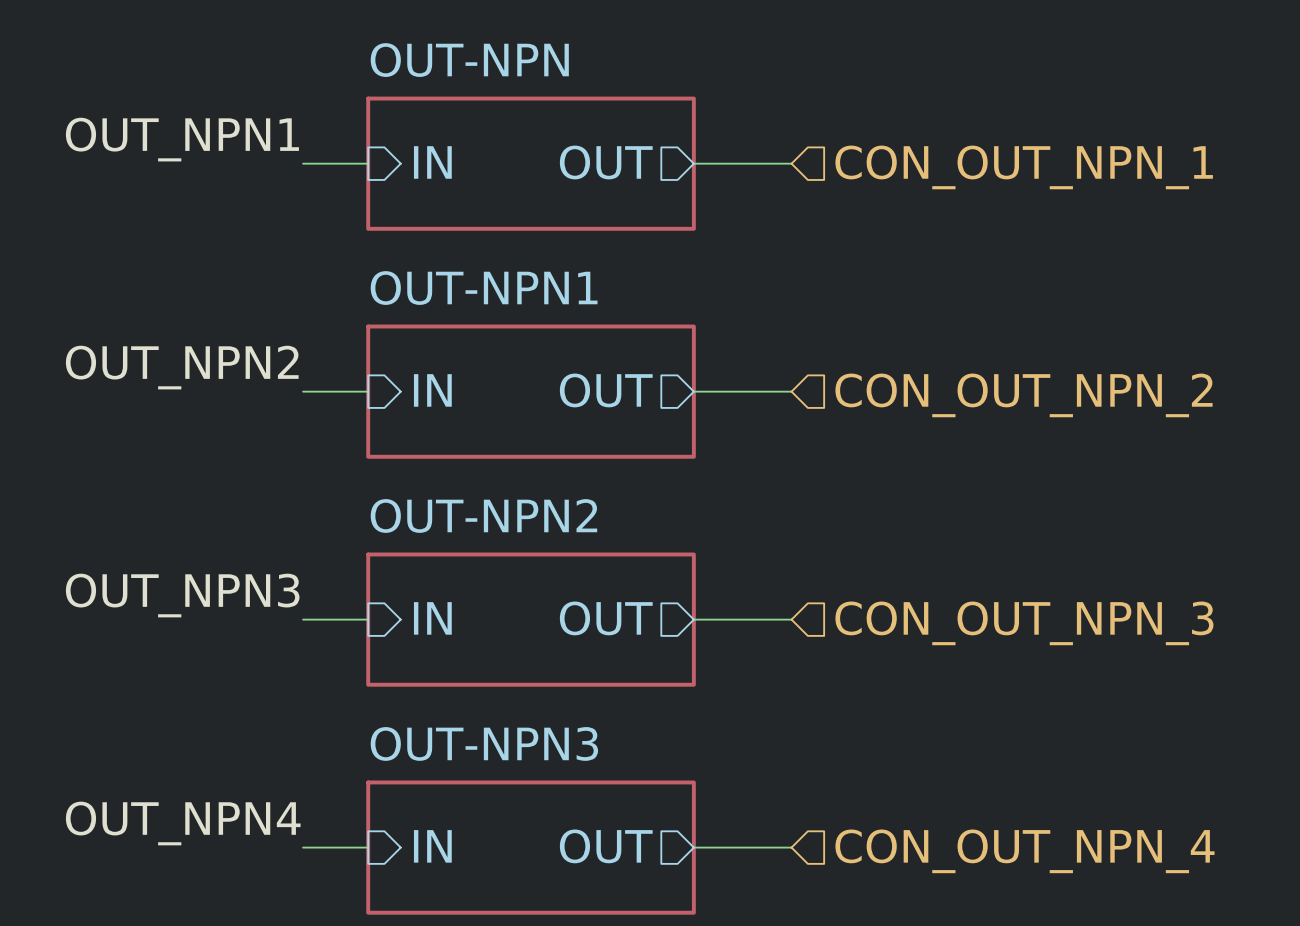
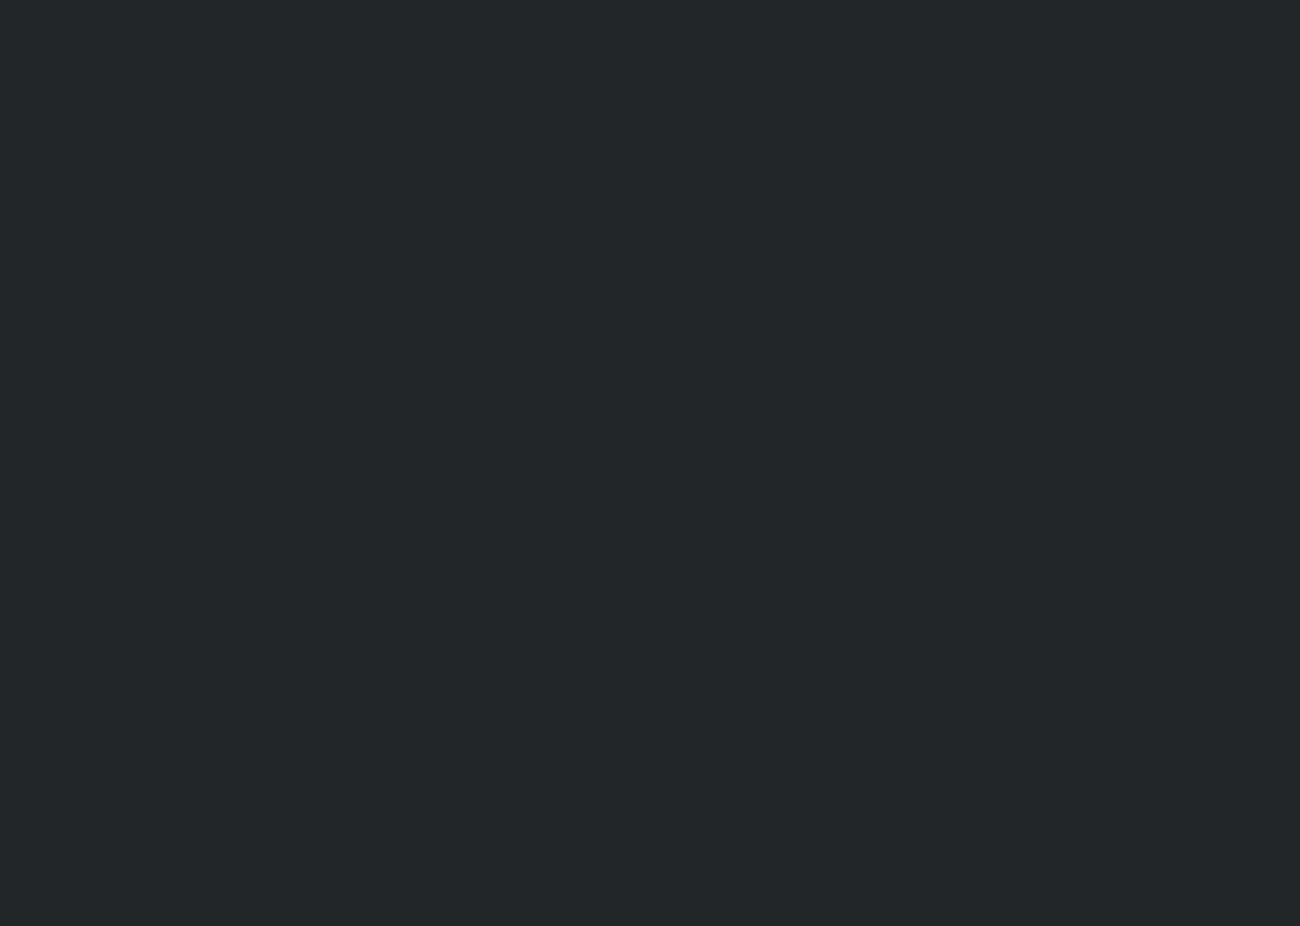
label: OUT_NPN1 (182, 139) -> none
sheet pin: IN (432, 162) -> none
sheet pin: OUT (606, 162) -> none
wire: (303, 163) (368, 163) -> none
sheet OUT-NPN: (531, 163) -> none
wire: (693, 163) (791, 163) -> none
hierarchical label: CON_OUT_NPN_1 (1024, 167) -> none
label: OUT_NPN2 (182, 367) -> none
sheet pin: IN (432, 390) -> none
sheet pin: OUT (606, 390) -> none
wire: (303, 391) (368, 391) -> none
sheet OUT-NPN1: (531, 391) -> none
wire: (693, 391) (791, 391) -> none
hierarchical label: CON_OUT_NPN_2 (1024, 395) -> none
label: OUT_NPN3 (182, 595) -> none
sheet pin: IN (432, 618) -> none
sheet pin: OUT (606, 618) -> none
wire: (303, 619) (368, 619) -> none
sheet OUT-NPN2: (531, 619) -> none
wire: (693, 619) (791, 619) -> none
hierarchical label: CON_OUT_NPN_3 (1024, 623) -> none
label: OUT_NPN4 (183, 823) -> none
sheet pin: IN (432, 846) -> none
sheet pin: OUT (606, 846) -> none
wire: (303, 847) (368, 847) -> none
sheet OUT-NPN3: (531, 847) -> none
wire: (693, 847) (791, 847) -> none
hierarchical label: CON_OUT_NPN_4 (1024, 851) -> none

